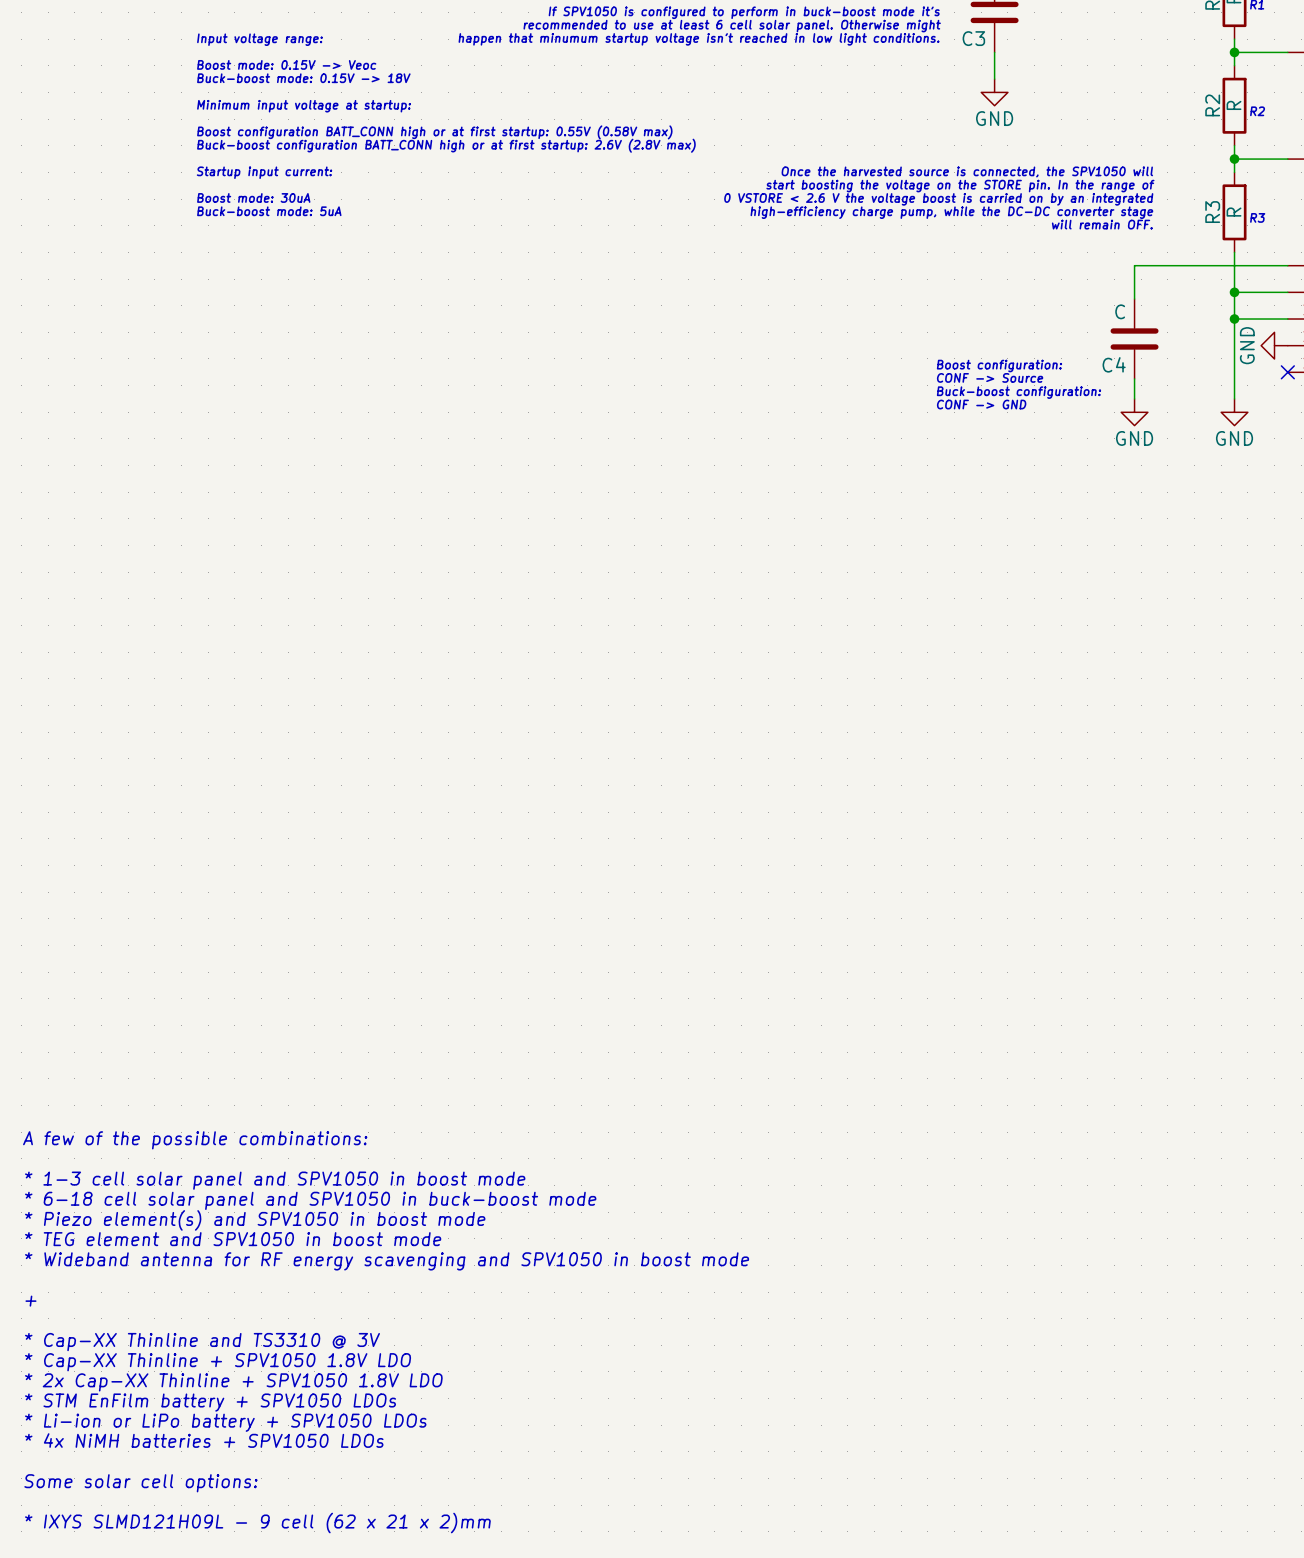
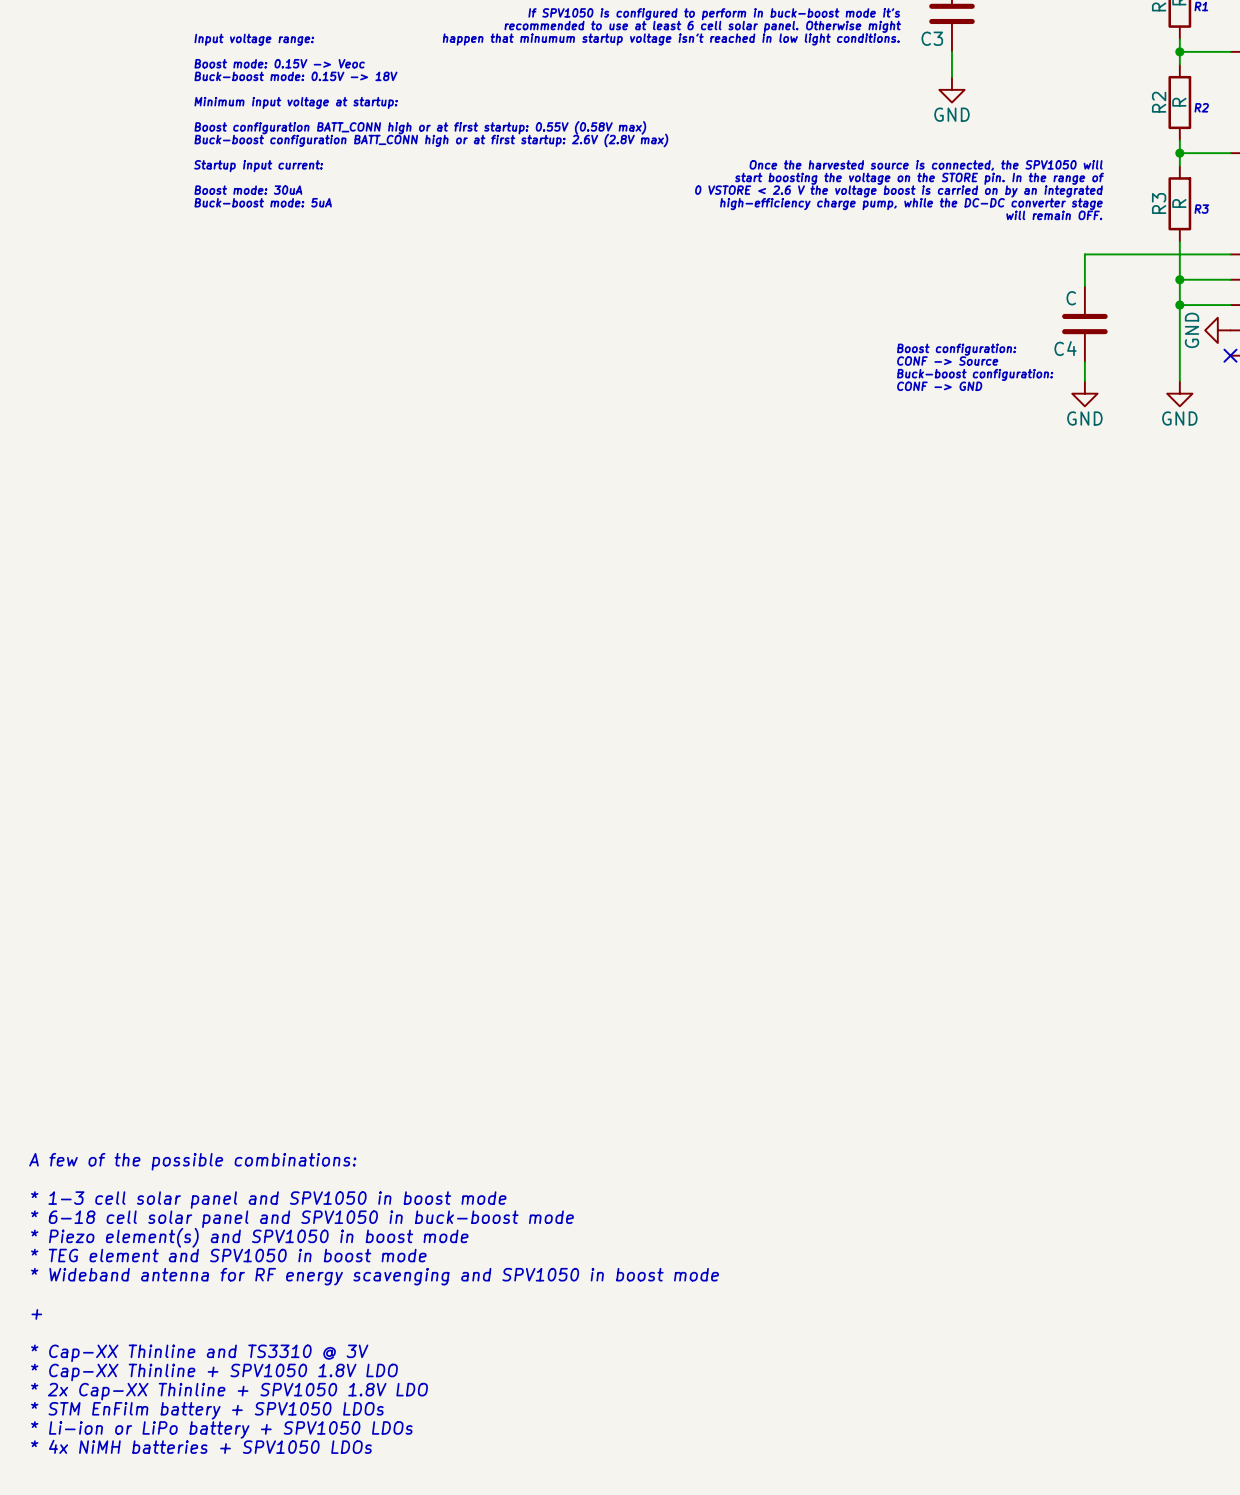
text: A few of the possible combinations: (195, 1140) -> none
text: * 1-3 cell solar panel and SPV1050 in boost mode (275, 1180) -> none
text position: * 6-18 cell solar panel and SPV1050 in buck-boost mode (310, 1200) -> * 6-18 cell solar panel and SPV1050 in buck-boost mode (302, 1219)
text: * Piezo element(s) and SPV1050 in boost mode (255, 1220) -> A few of the possible combinations: (192, 1161)
text position: * TEG element and SPV1050 in boost mode (233, 1239) -> * TEG element and SPV1050 in boost mode (228, 1255)
text: * Wideband antenna for RF energy scavenging and SPV1050 in boost mode (387, 1261) -> * 1-3 cell solar panel and SPV1050 in boost mode (268, 1200)
text: + (30, 1301) -> * Piezo element(s) and SPV1050 in boost mode (249, 1237)
text: * Cap-XX Thinline and TS3310 @ 3V (202, 1342) -> * Wideband antenna for RF energy scavenging and SPV1050 in boost mode (375, 1276)
text: * Cap-XX Thinline + SPV1050 1.8V LDO (218, 1362) -> none
text: * 2x Cap-XX Thinline + SPV1050 1.8V LDO (233, 1382) -> + (36, 1314)
text: * STM EnFilm battery + SPV1050 LDOs (210, 1402) -> none
text: * Li-ion or LiPo battery + SPV1050 LDOs (225, 1422) -> * Cap-XX Thinline and TS3310 @ 3V (199, 1353)
text: * 4x NiMH batteries + SPV1050 LDOs (204, 1440) -> * Cap-XX Thinline + SPV1050 1.8V LDO (214, 1372)
text: none -> * 2x Cap-XX Thinline + SPV1050 1.8V LDO (229, 1391)
text: Some solar cell options: (140, 1483) -> * STM EnFilm battery + SPV1050 LDOs (207, 1410)
text: none -> * Li-ion or LiPo battery + SPV1050 LDOs (221, 1429)
text: * IXYS SLMD121H09L - 9 cell (62 x 21 x 2)mm (257, 1523) -> * 4x NiMH batteries + SPV1050 LDOs (201, 1446)

